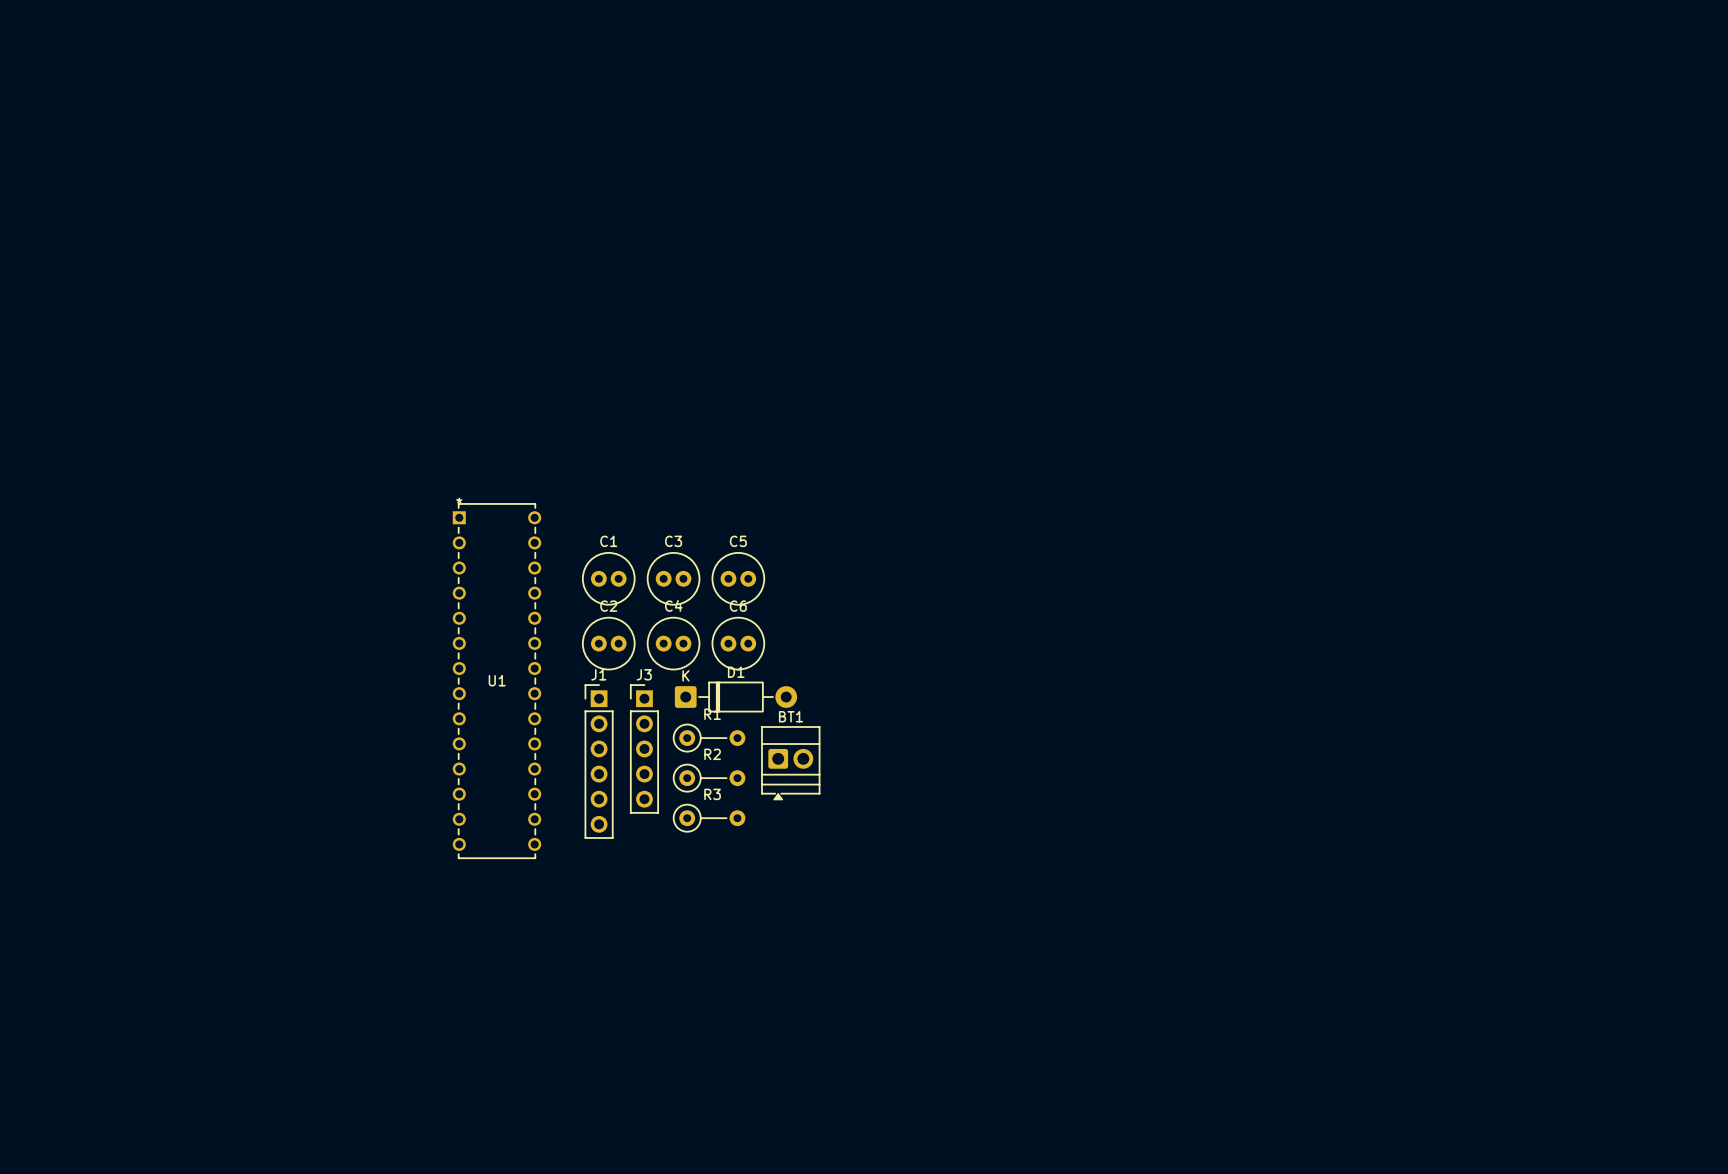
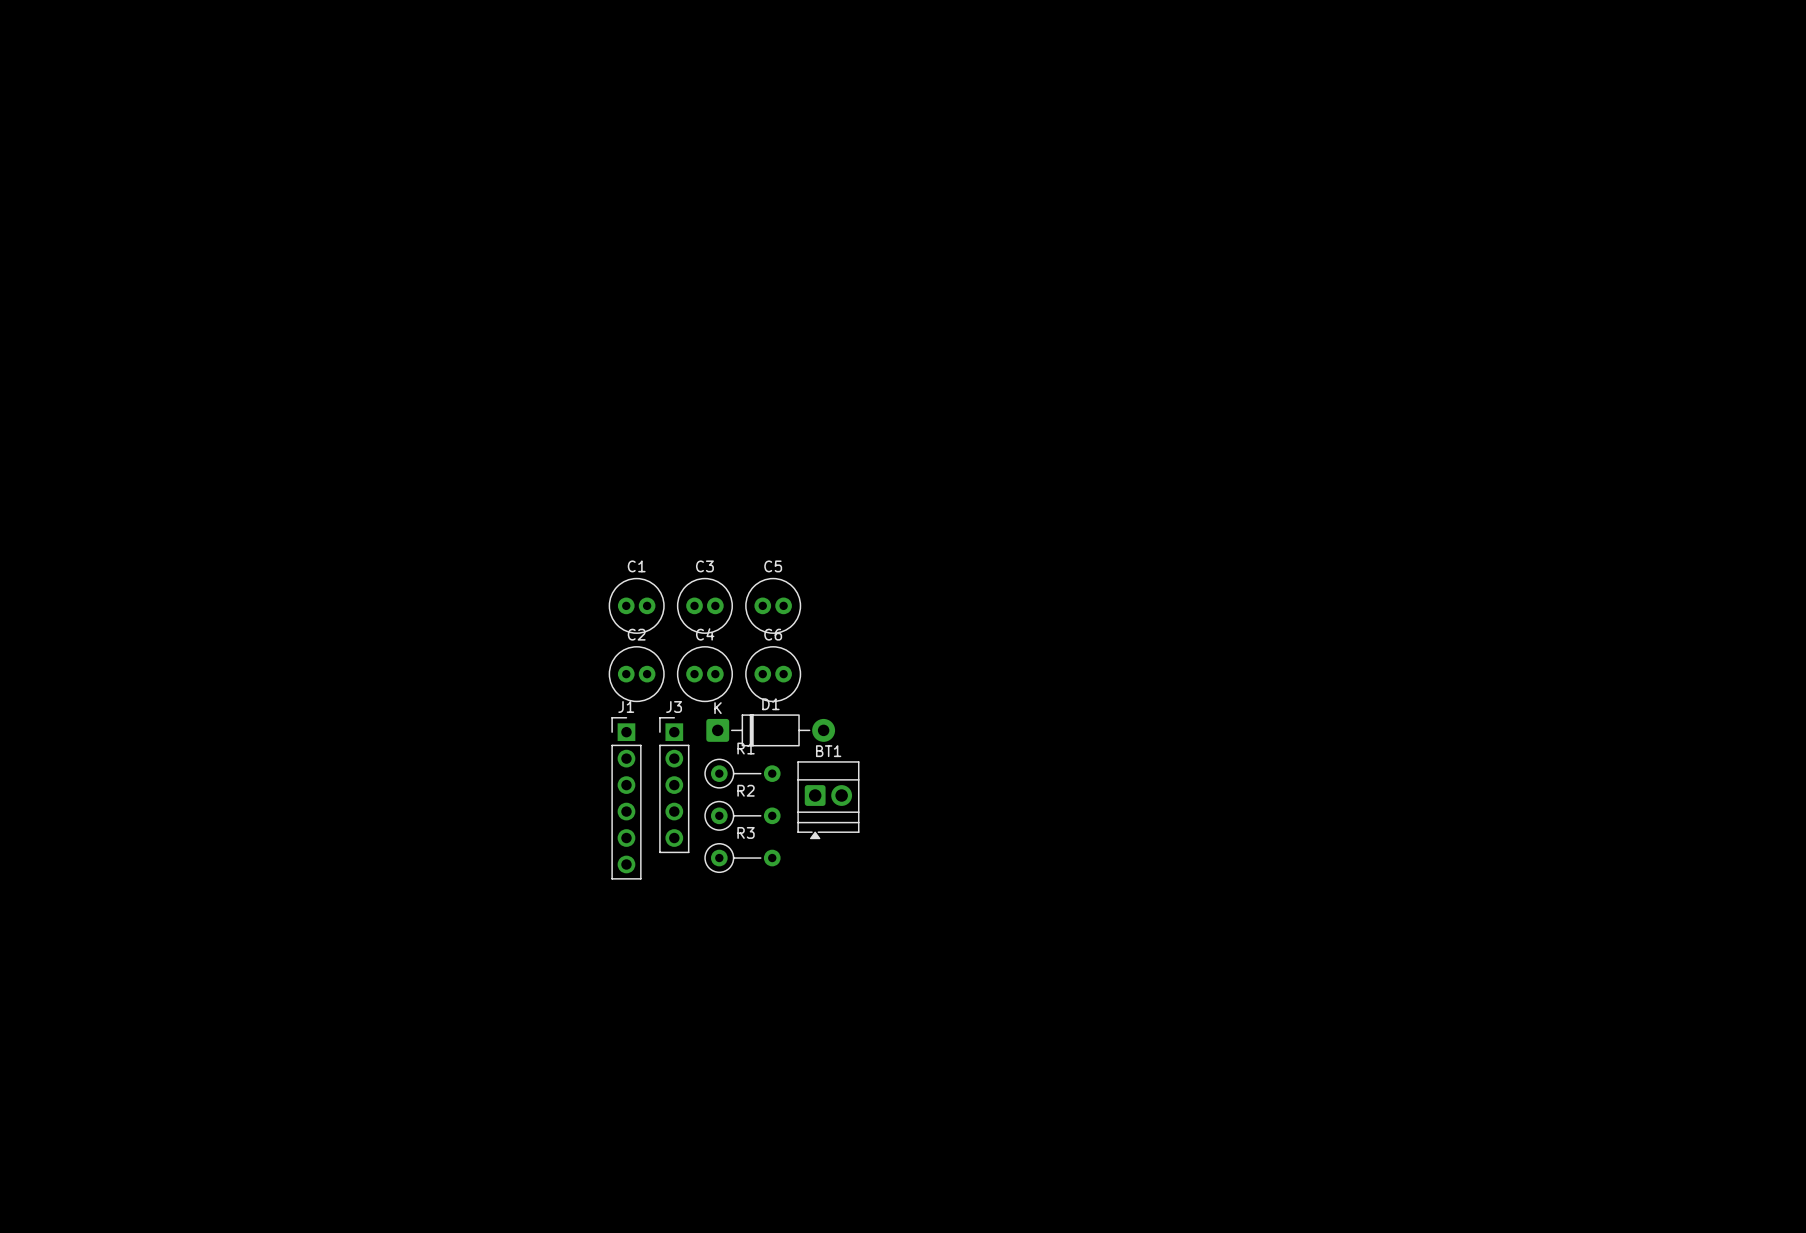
U1: (496, 681) -> none

